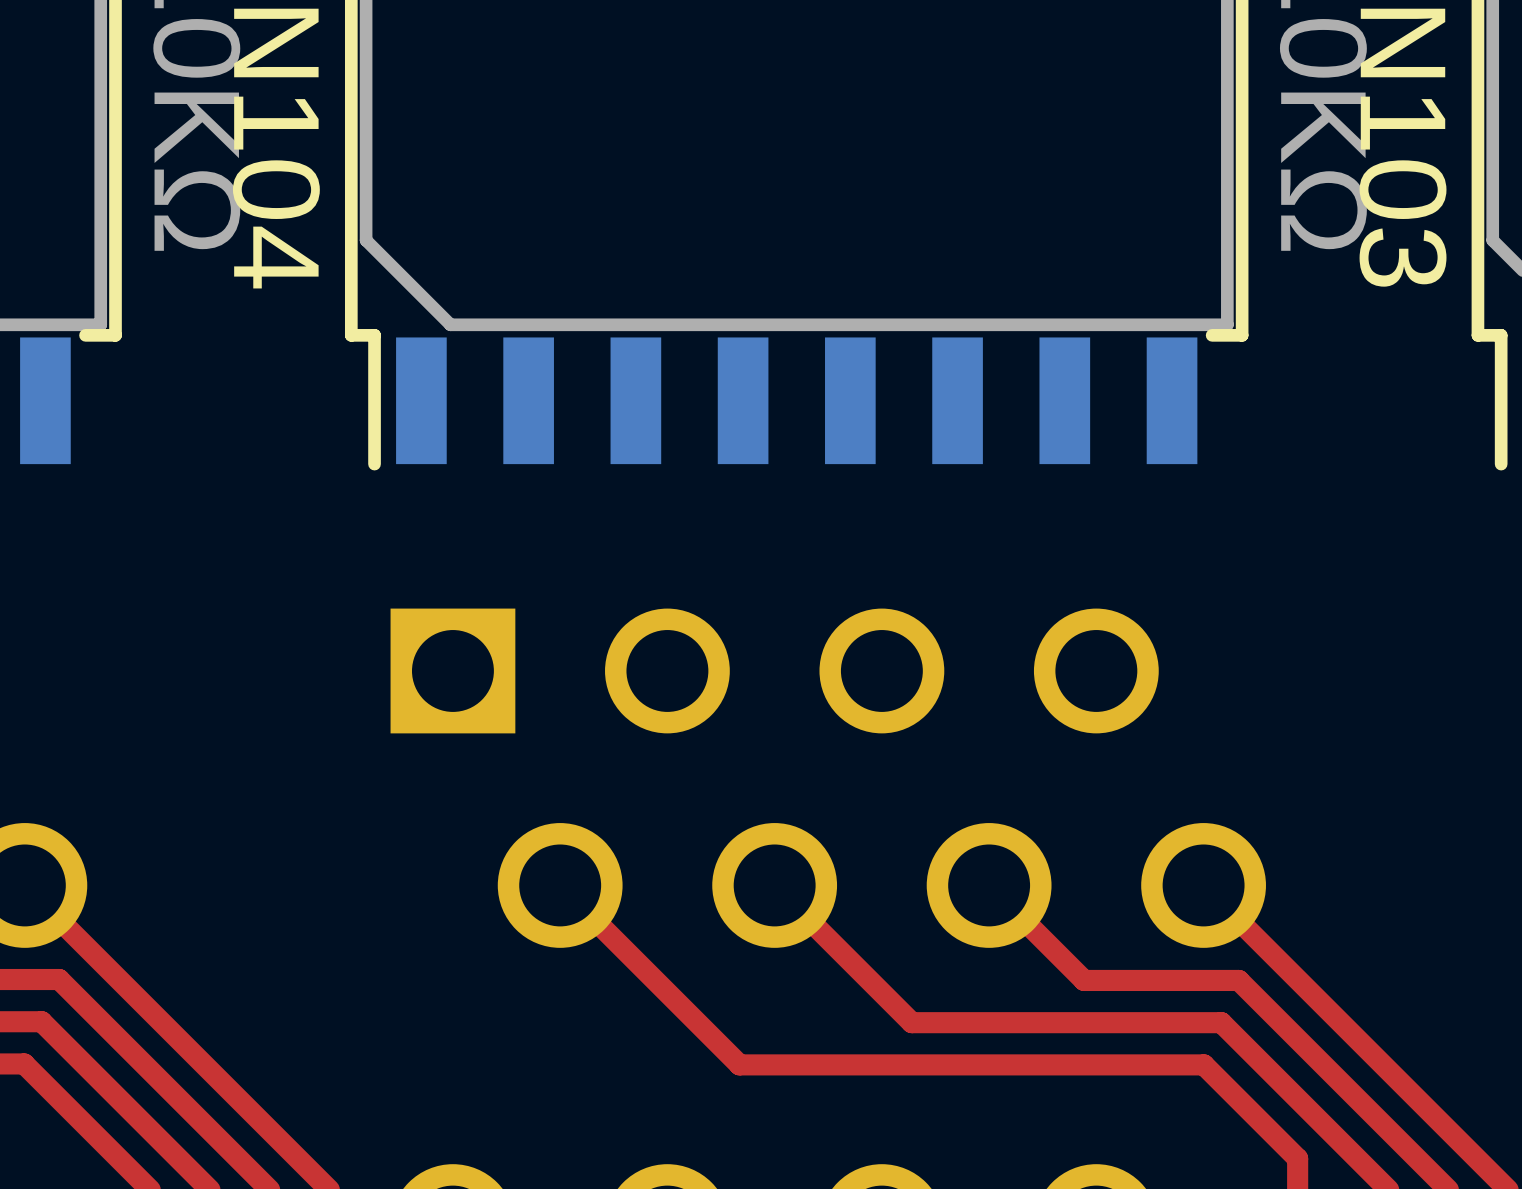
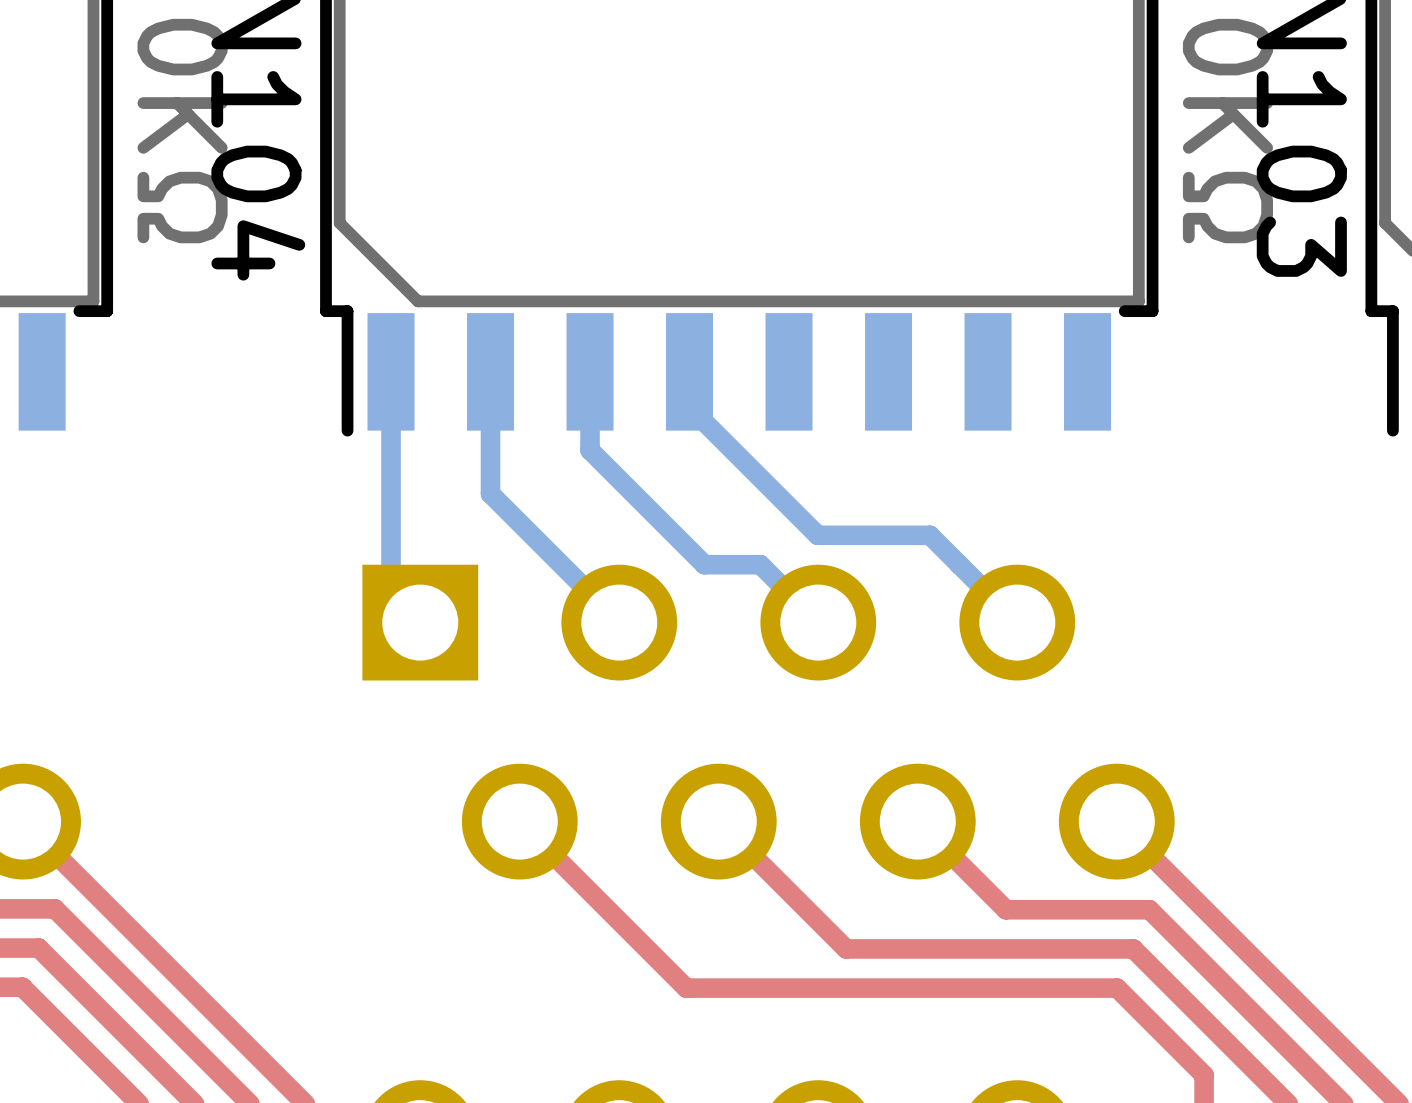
bottom track: none -> (391, 371) (391, 593) (420, 622)
bottom track: none -> (490, 371) (490, 493) (619, 622)
bottom track: none -> (590, 371) (590, 450) (704, 564) (760, 564) (818, 622)
bottom track: none -> (689, 371) (689, 407) (817, 535) (930, 535) (1017, 622)

